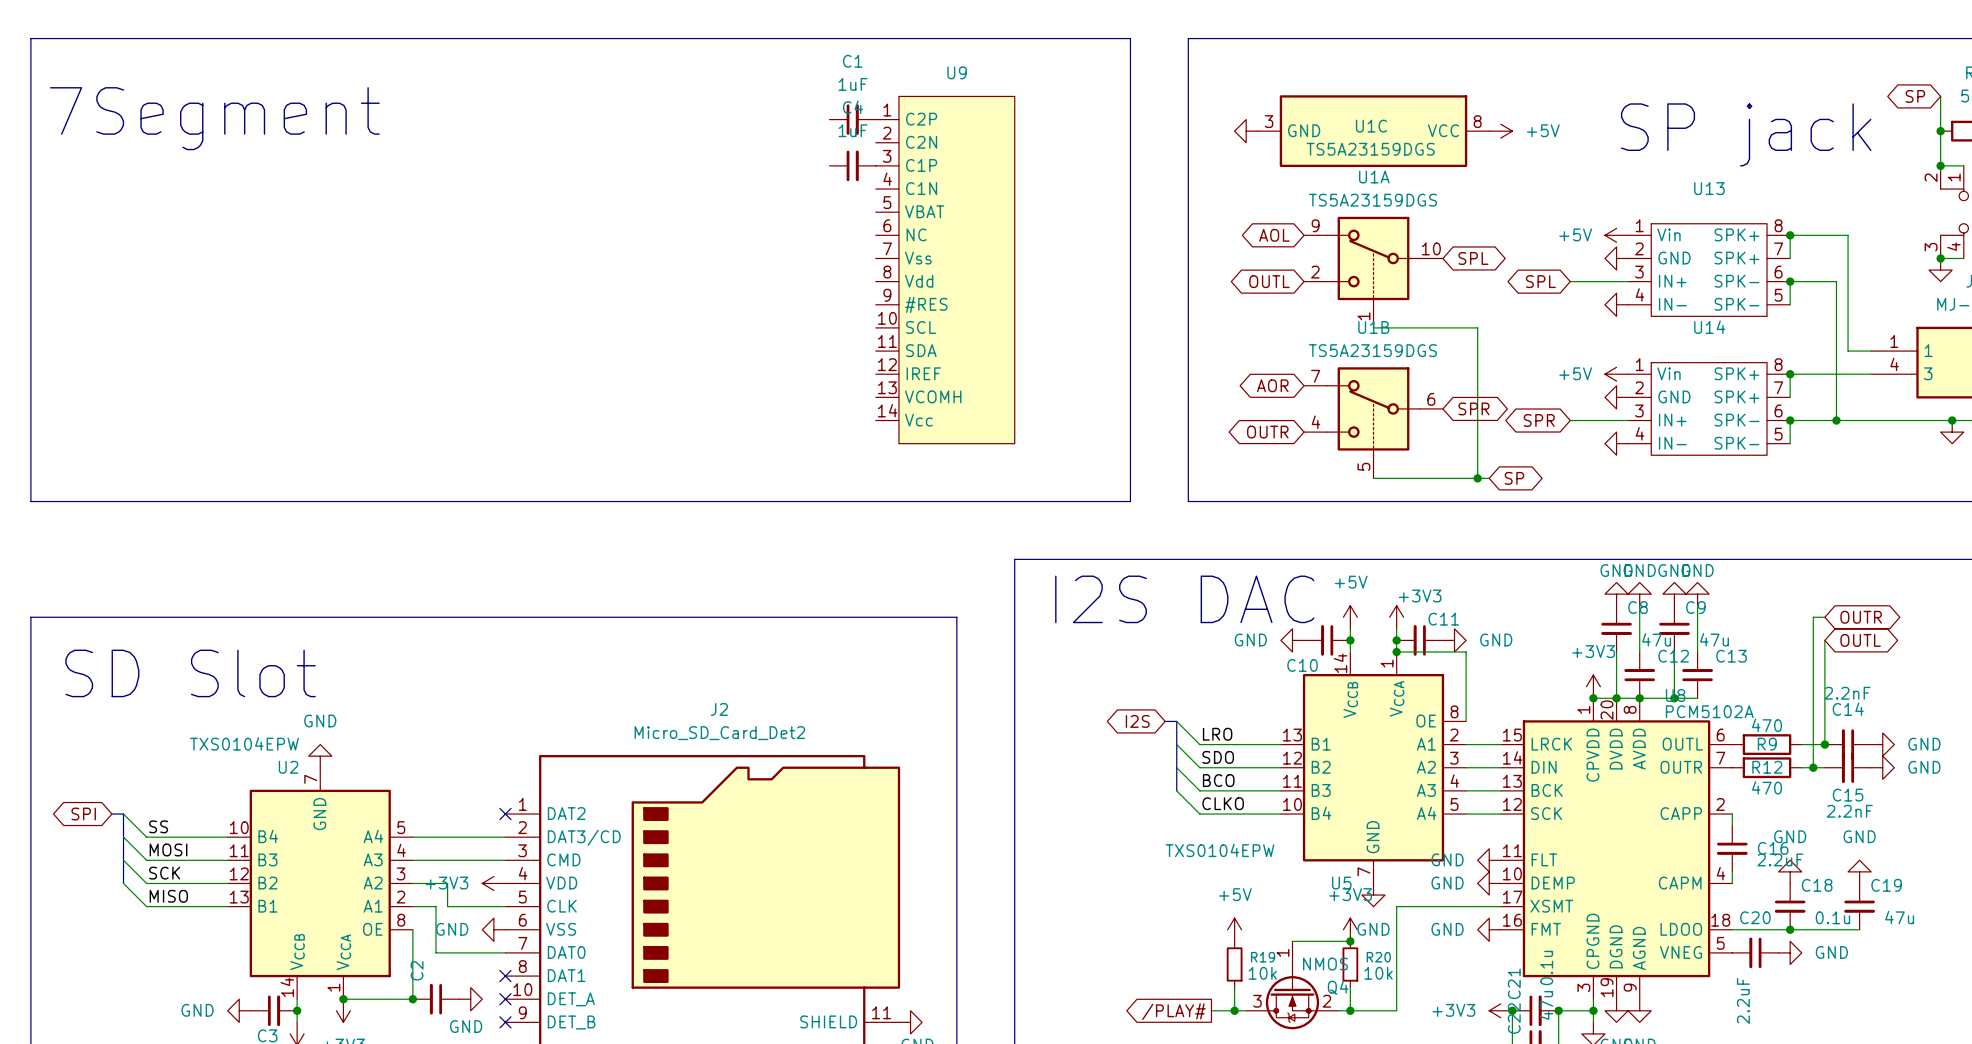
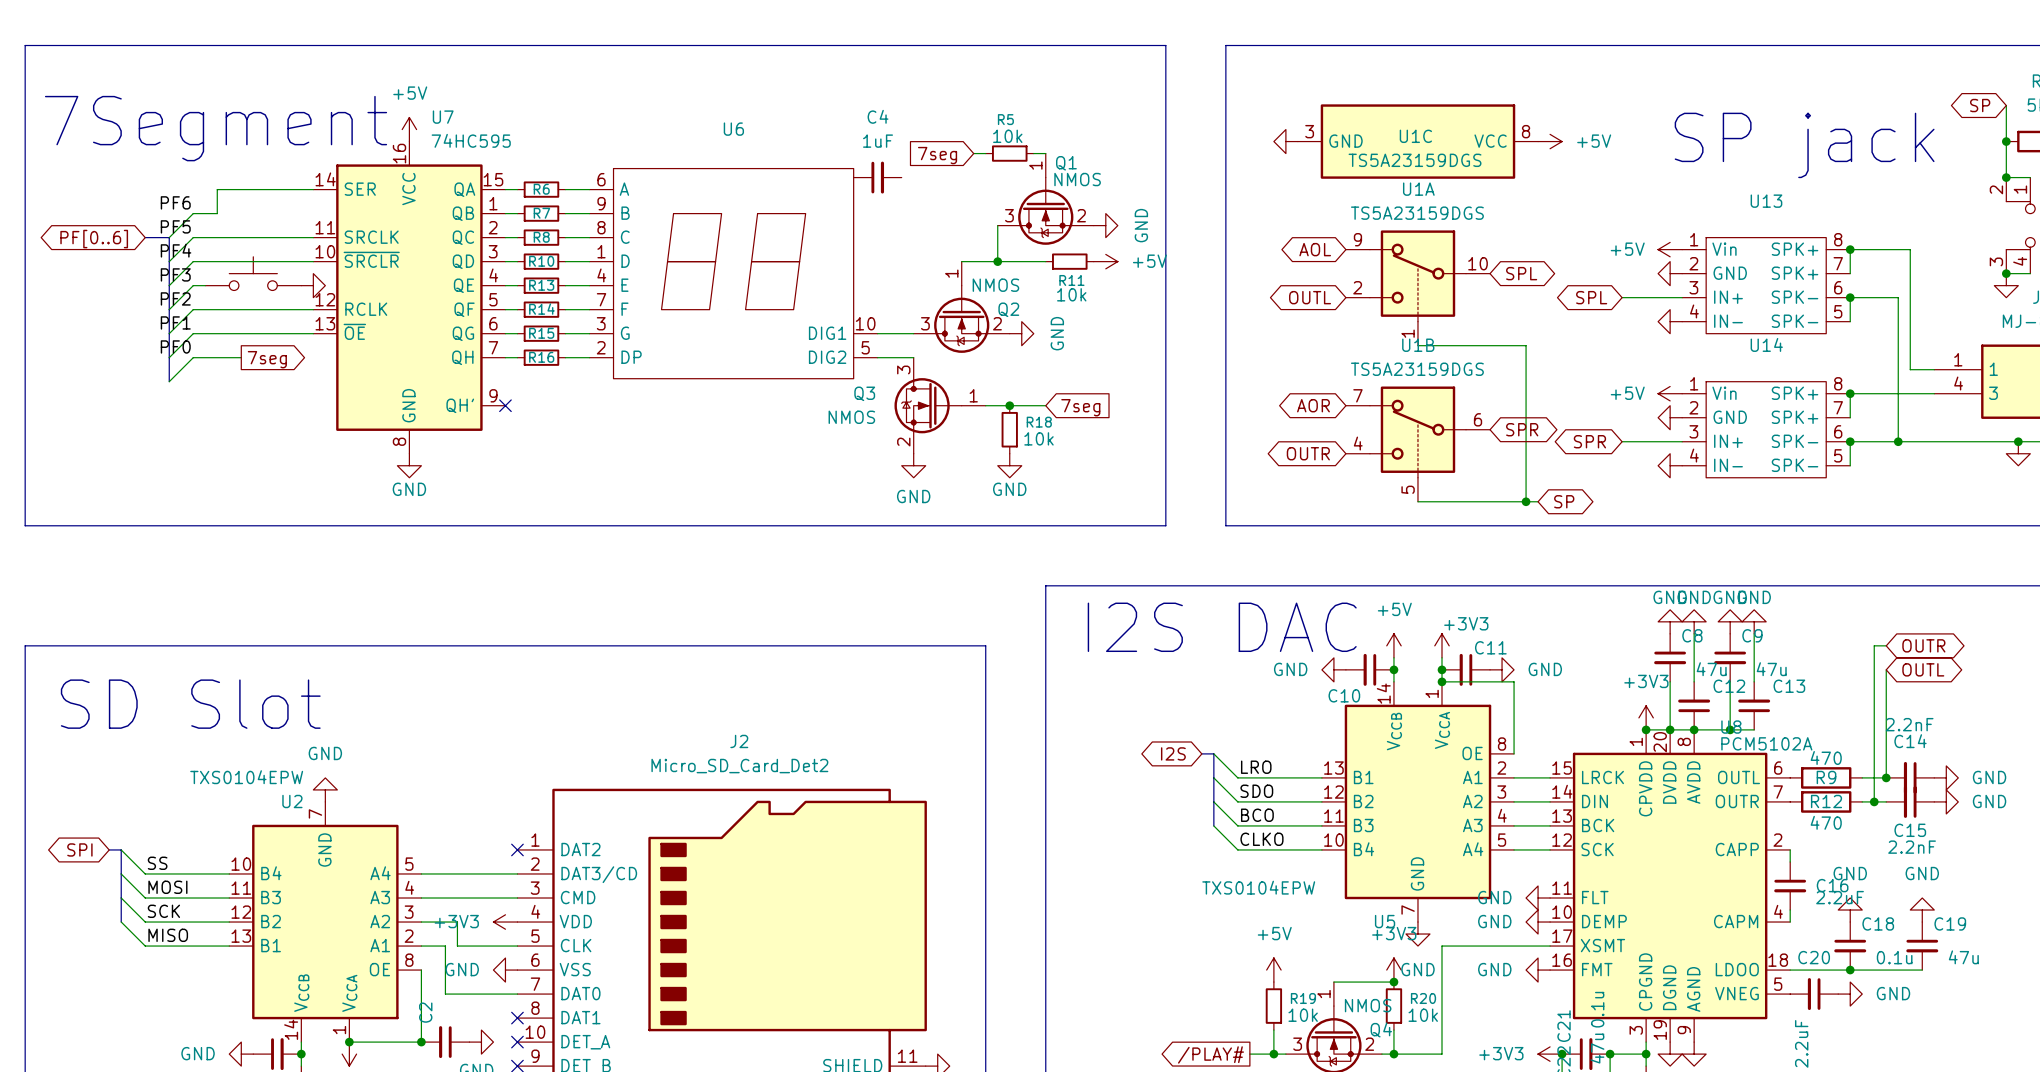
power symbol: none -> +5V (409, 129)
C1: 1uF (852, 119) -> none
R5: none -> 10k (1009, 153)
global label: none -> 7seg (937, 155)
wire: none -> (313, 189) (217, 189) (217, 213) (193, 213) (169, 237)
wire: none -> (505, 189) (517, 189)
R6: none -> (541, 189)
wire: none -> (565, 189) (589, 189)
Q1: none -> NMOS (1045, 199)
label: none -> PF6 (175, 202)
wire: none -> (505, 213) (517, 213)
R7: none -> (541, 213)
wire: none -> (565, 213) (589, 213)
power symbol: none -> GND (1105, 225)
label: none -> PF5 (175, 226)
bus: none -> (145, 237) (169, 237) (169, 381)
wire: none -> (313, 237) (193, 237) (169, 261)
wire: none -> (505, 237) (517, 237)
R8: none -> (541, 237)
wire: none -> (565, 237) (589, 237)
global label: none -> PF[0..6] (94, 239)
label: none -> PF4 (176, 250)
wire: none -> (313, 261) (193, 261) (169, 285)
wire: none -> (505, 261) (517, 261)
R10: none -> (541, 261)
wire: none -> (565, 261) (589, 261)
junction: none -> (997, 261)
R11: none -> 10k (1069, 261)
power symbol: none -> +5V (1105, 261)
part: none -> (253, 273)
U6: none -> (733, 273)
label: none -> PF3 (175, 274)
wire: none -> (205, 285) (193, 285) (169, 309)
power symbol: none -> (313, 285)
wire: none -> (505, 285) (517, 285)
R13: none -> (541, 285)
wire: none -> (565, 285) (589, 285)
U9: (945, 270) -> none
U7: none -> 74HC595 (409, 297)
label: none -> PF2 (175, 298)
Q2: none -> NMOS (961, 307)
wire: none -> (313, 309) (193, 309) (169, 333)
wire: none -> (505, 309) (517, 309)
R14: none -> (541, 309)
wire: none -> (565, 309) (589, 309)
label: none -> PF1 (175, 322)
wire: none -> (313, 333) (193, 333) (169, 357)
wire: none -> (505, 333) (517, 333)
R15: none -> (541, 333)
wire: none -> (565, 333) (589, 333)
wire: none -> (877, 333) (913, 333)
power symbol: none -> GND (1021, 333)
label: none -> PF0 (175, 346)
wire: none -> (241, 357) (193, 357) (169, 381)
wire: none -> (505, 357) (517, 357)
R16: none -> (541, 357)
wire: none -> (565, 357) (589, 357)
wire: none -> (877, 357) (913, 357)
global label: none -> 7seg (267, 359)
no-connect mark: none -> (505, 405)
Q3: none -> NMOS (940, 405)
junction: none -> (1009, 405)
global label: none -> 7seg (1080, 407)
R18: none -> 10k (1009, 429)
power symbol: none -> GND (409, 465)
power symbol: none -> GND (913, 465)
power symbol: none -> GND (1009, 465)

